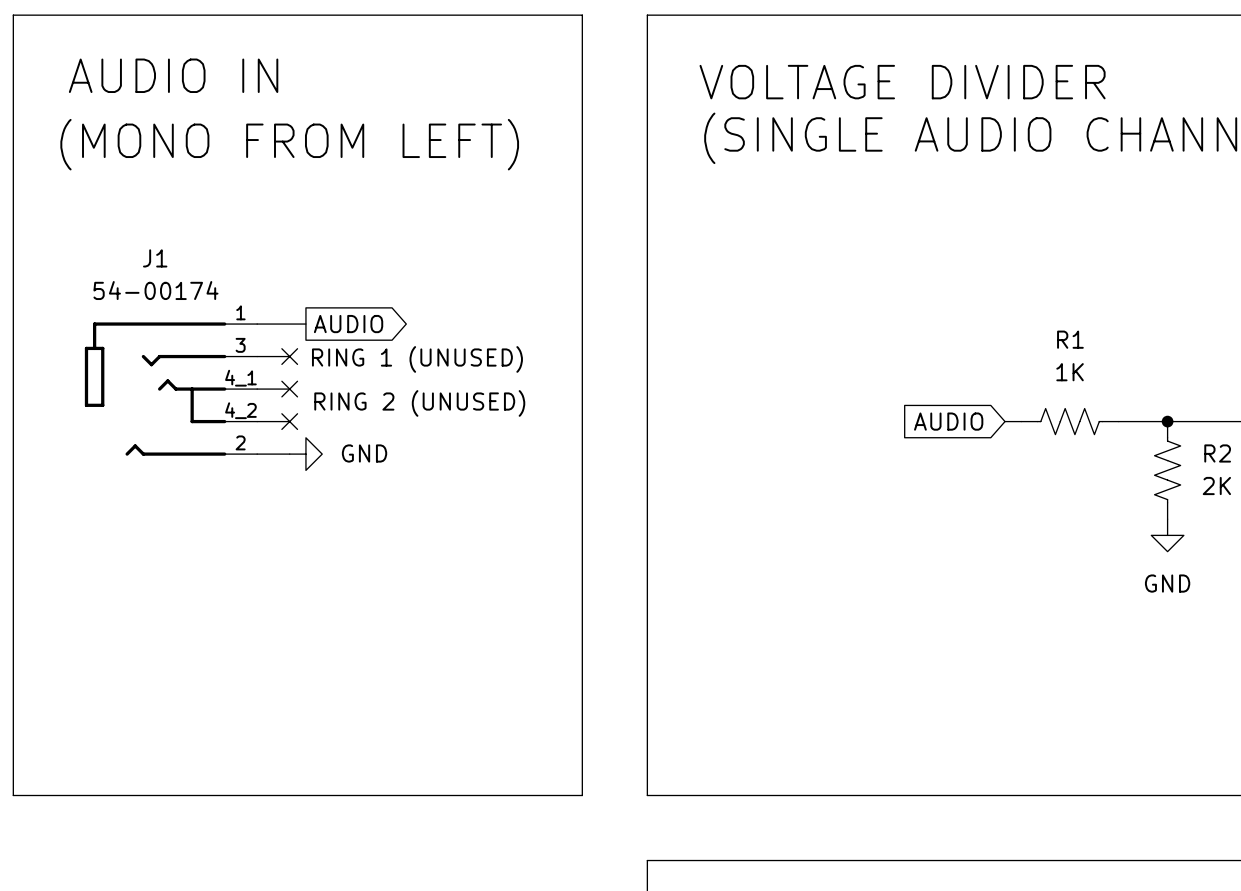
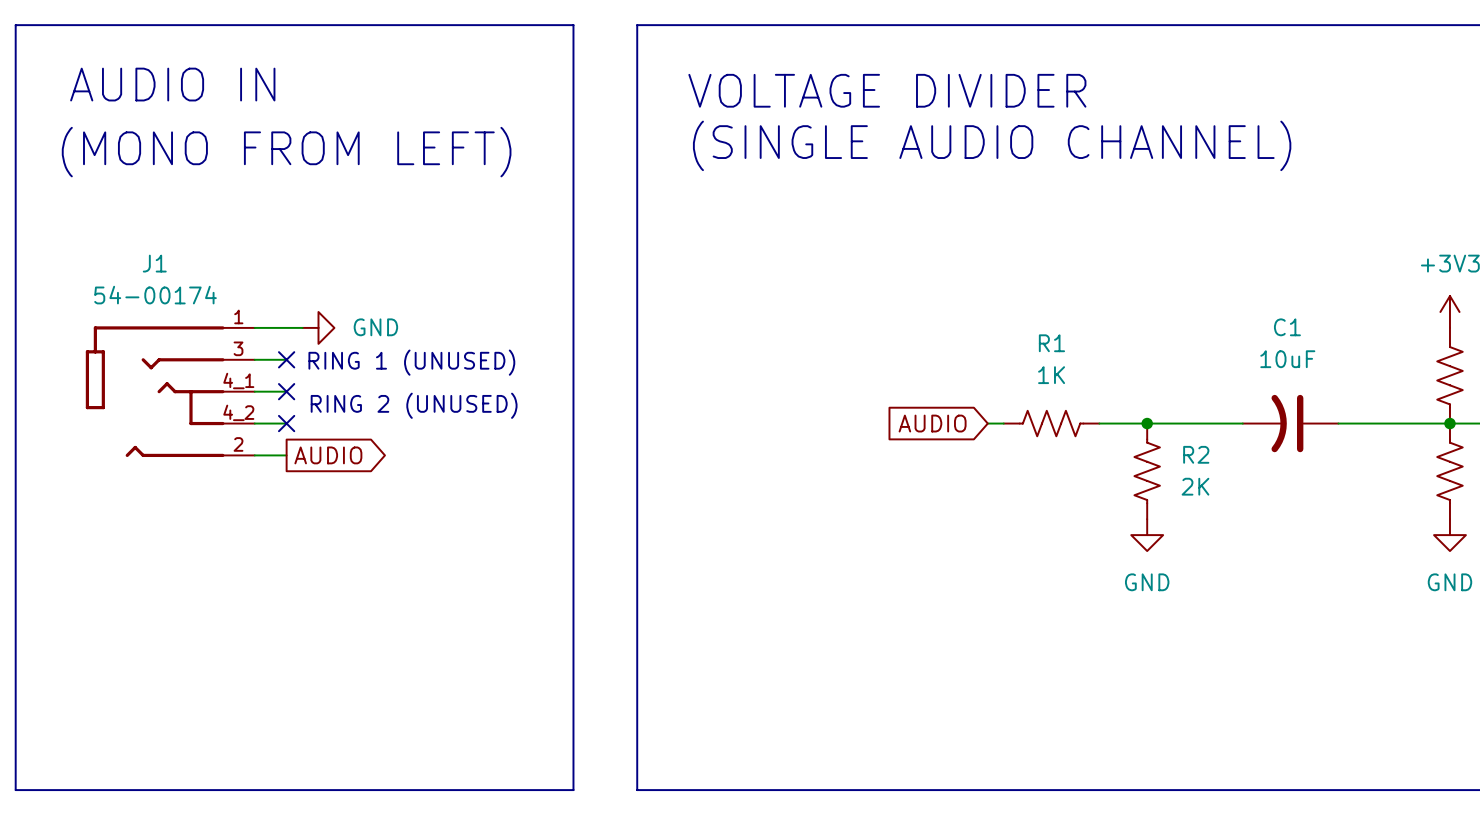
global label position: AUDIO (348, 324) -> AUDIO (328, 455)
power symbol position: GND (305, 454) -> GND (318, 327)

